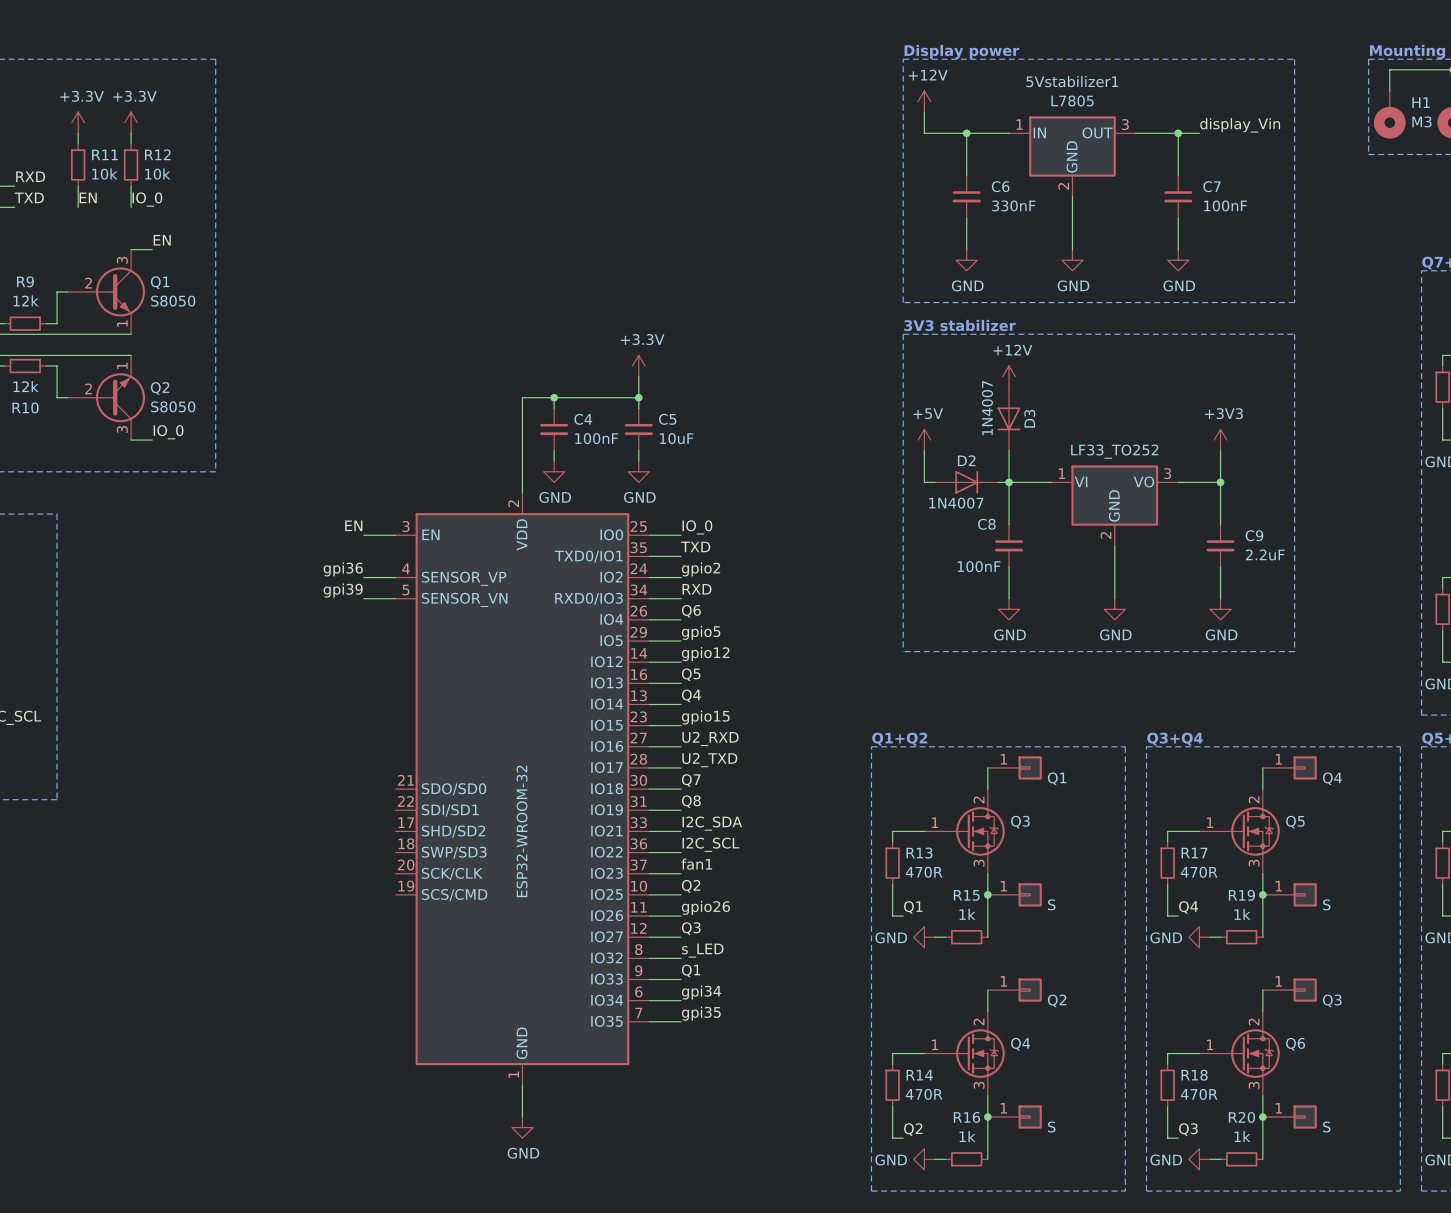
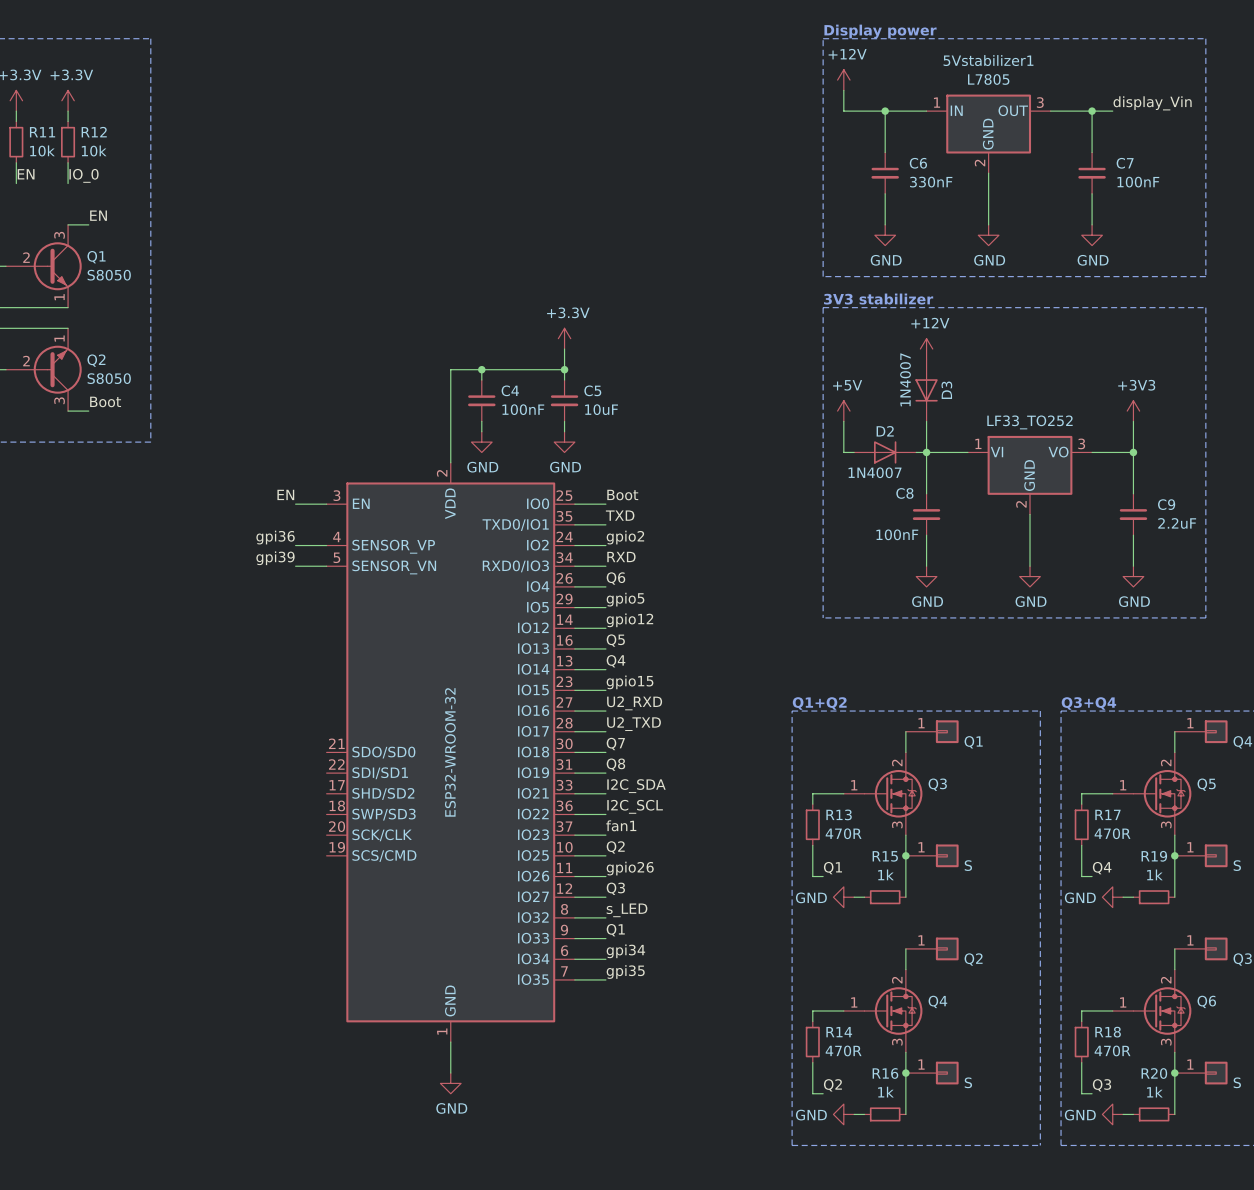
label: IO_0 (168, 432) -> Boot (105, 401)
label: IO_0 (697, 527) -> Boot (622, 495)
part value position: ESP32-WROOM-32 (522, 831) -> ESP32-WROOM-32 (450, 752)

